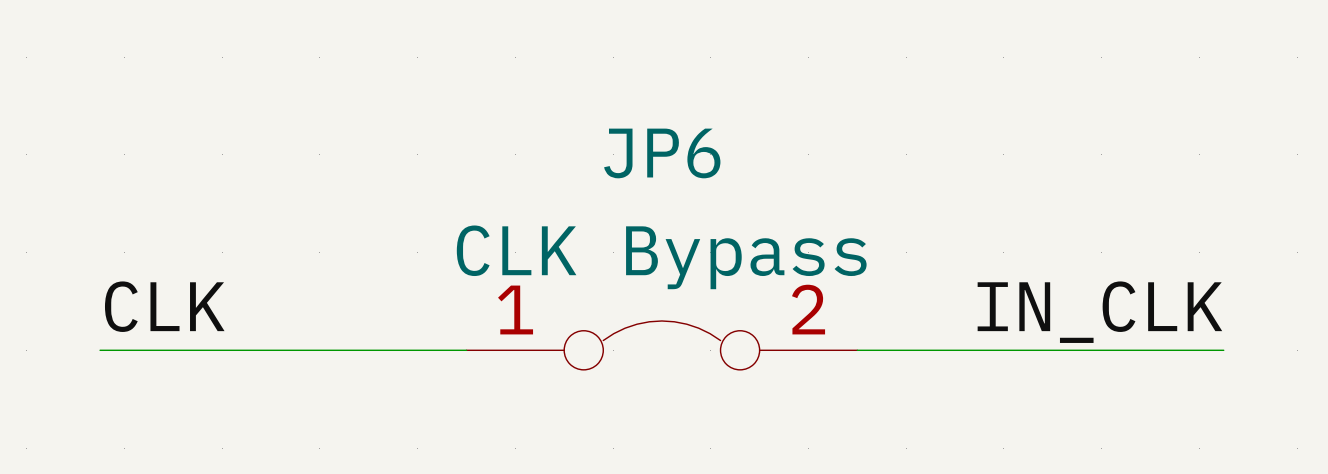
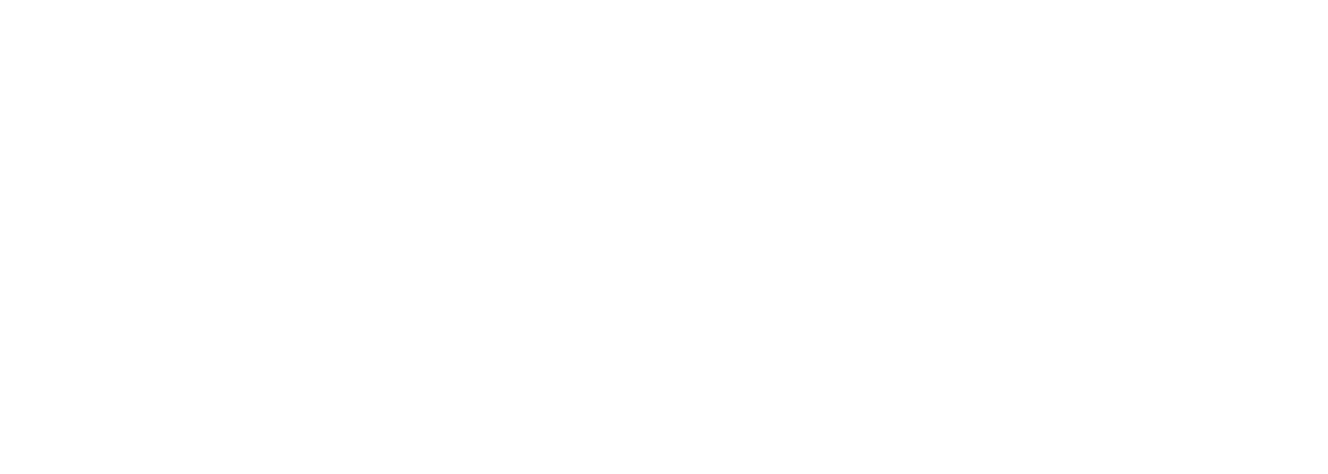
label: CLK (164, 306) -> none
label: IN_CLK (1099, 312) -> none
JP6: CLK Bypass (661, 345) -> none
wire: (100, 350) (466, 350) -> none
wire: (857, 350) (1223, 350) -> none

